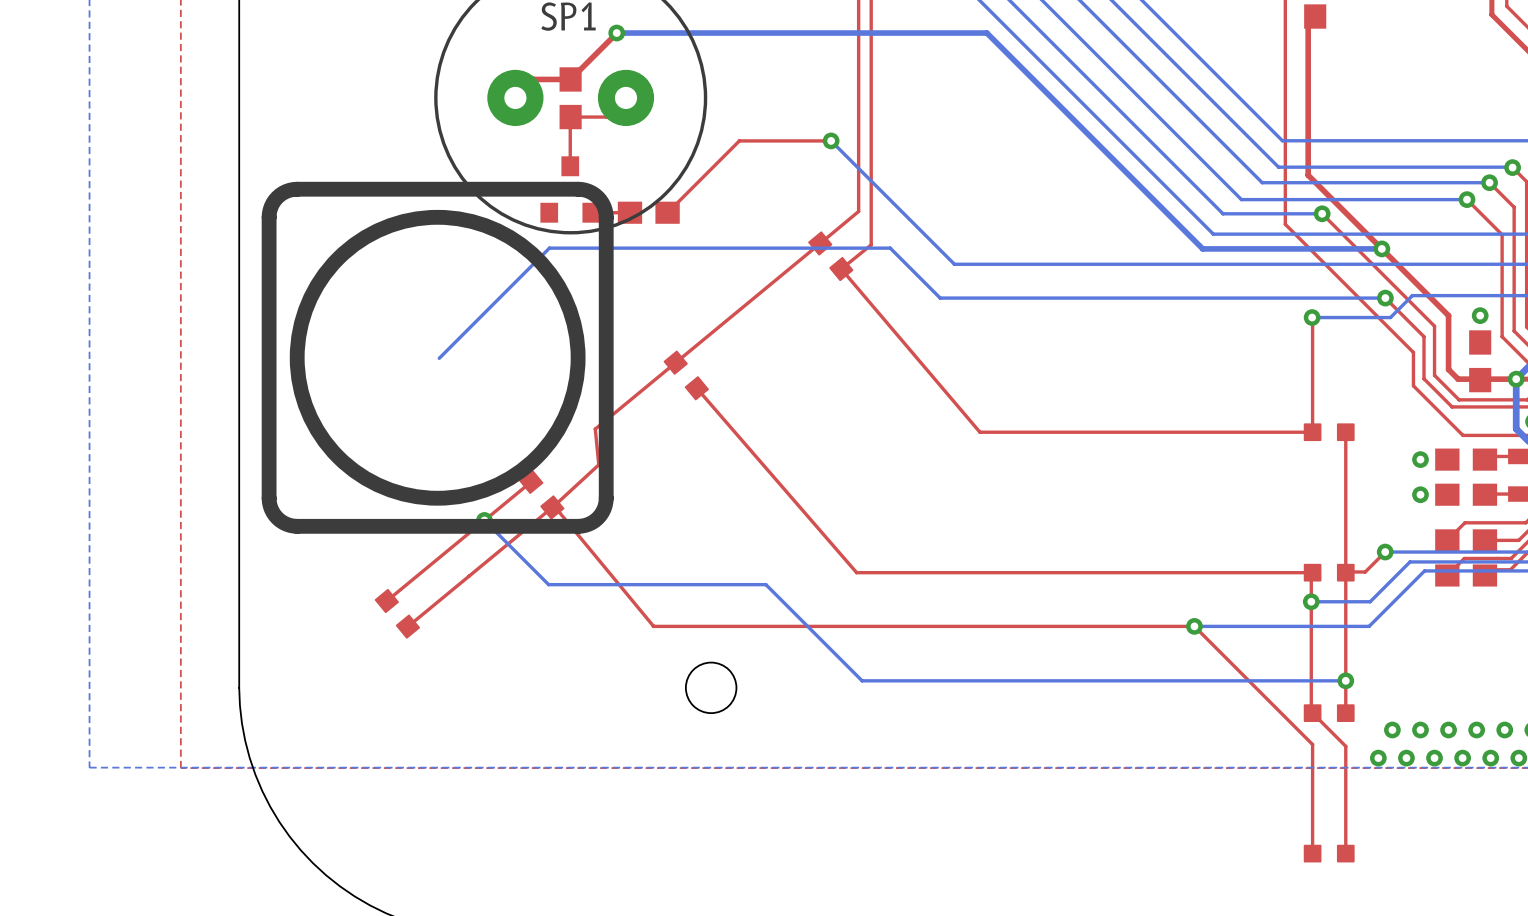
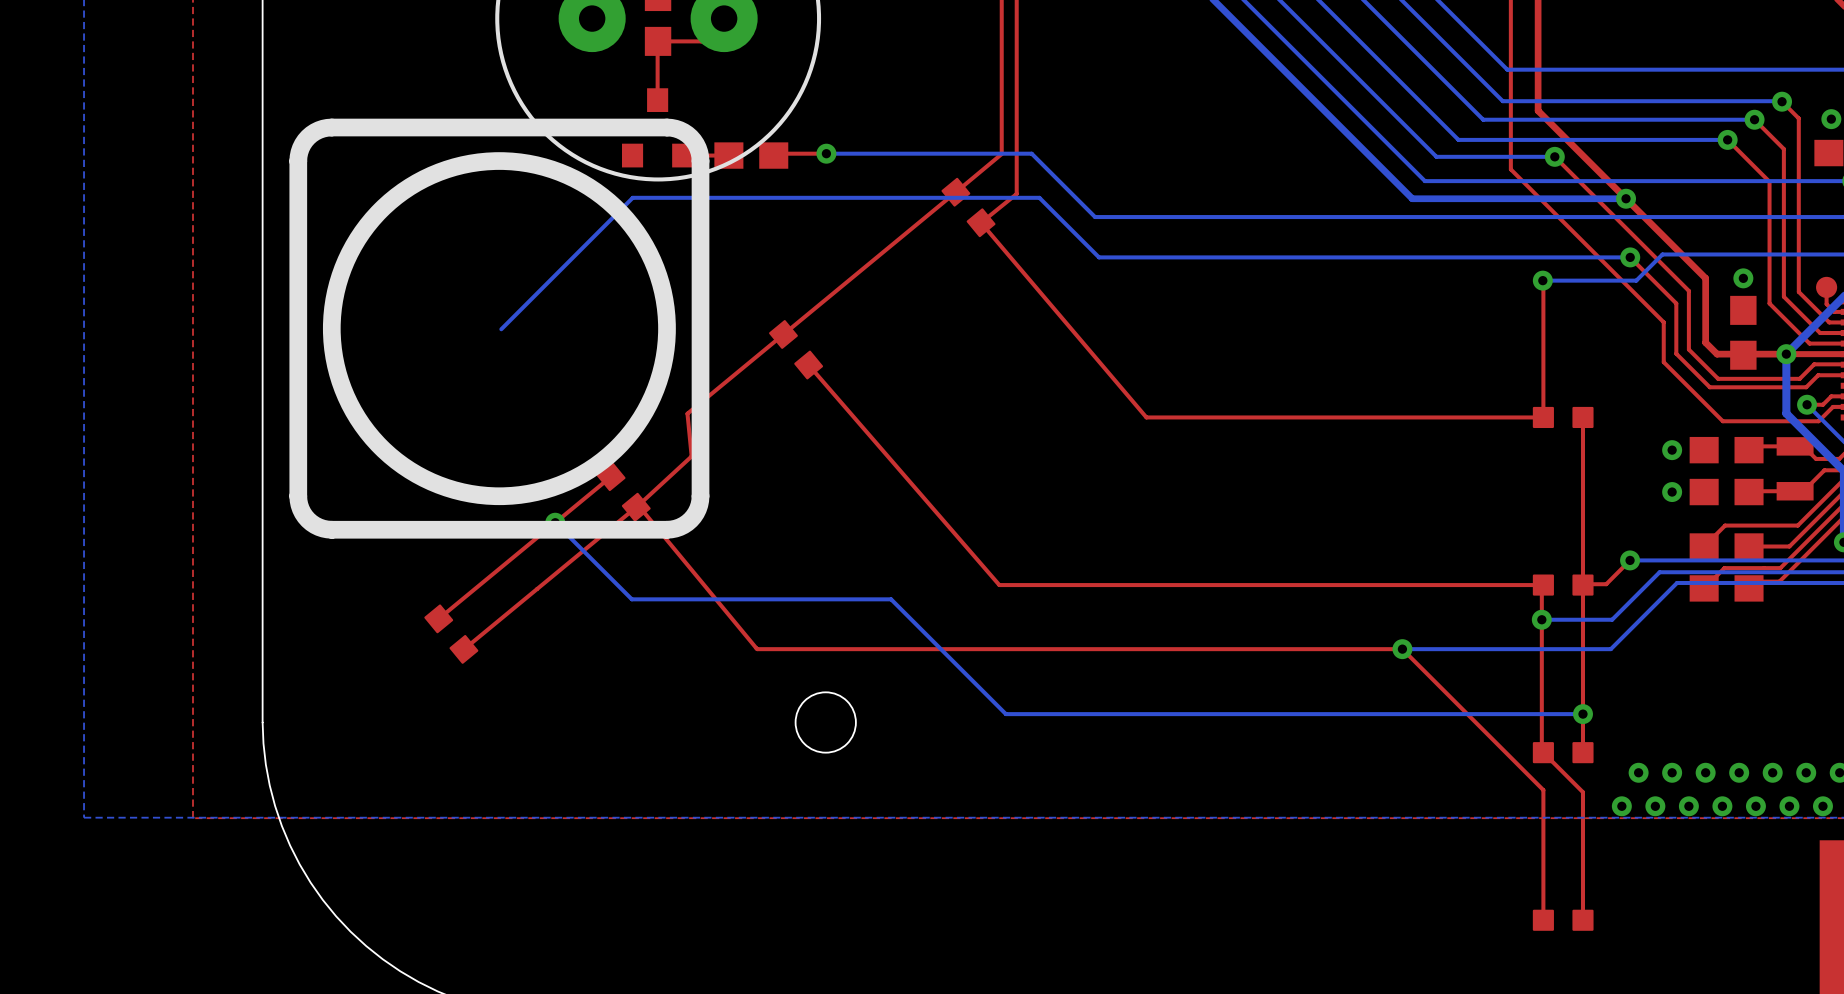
top track: (831, 140) (739, 140) (669, 211) -> (826, 153) (775, 153)
bottom track: (831, 140) (954, 264) -> (826, 153) (1031, 153) (1095, 217) (1116, 217)
via: (831, 140) -> none
via: none -> (826, 153)

